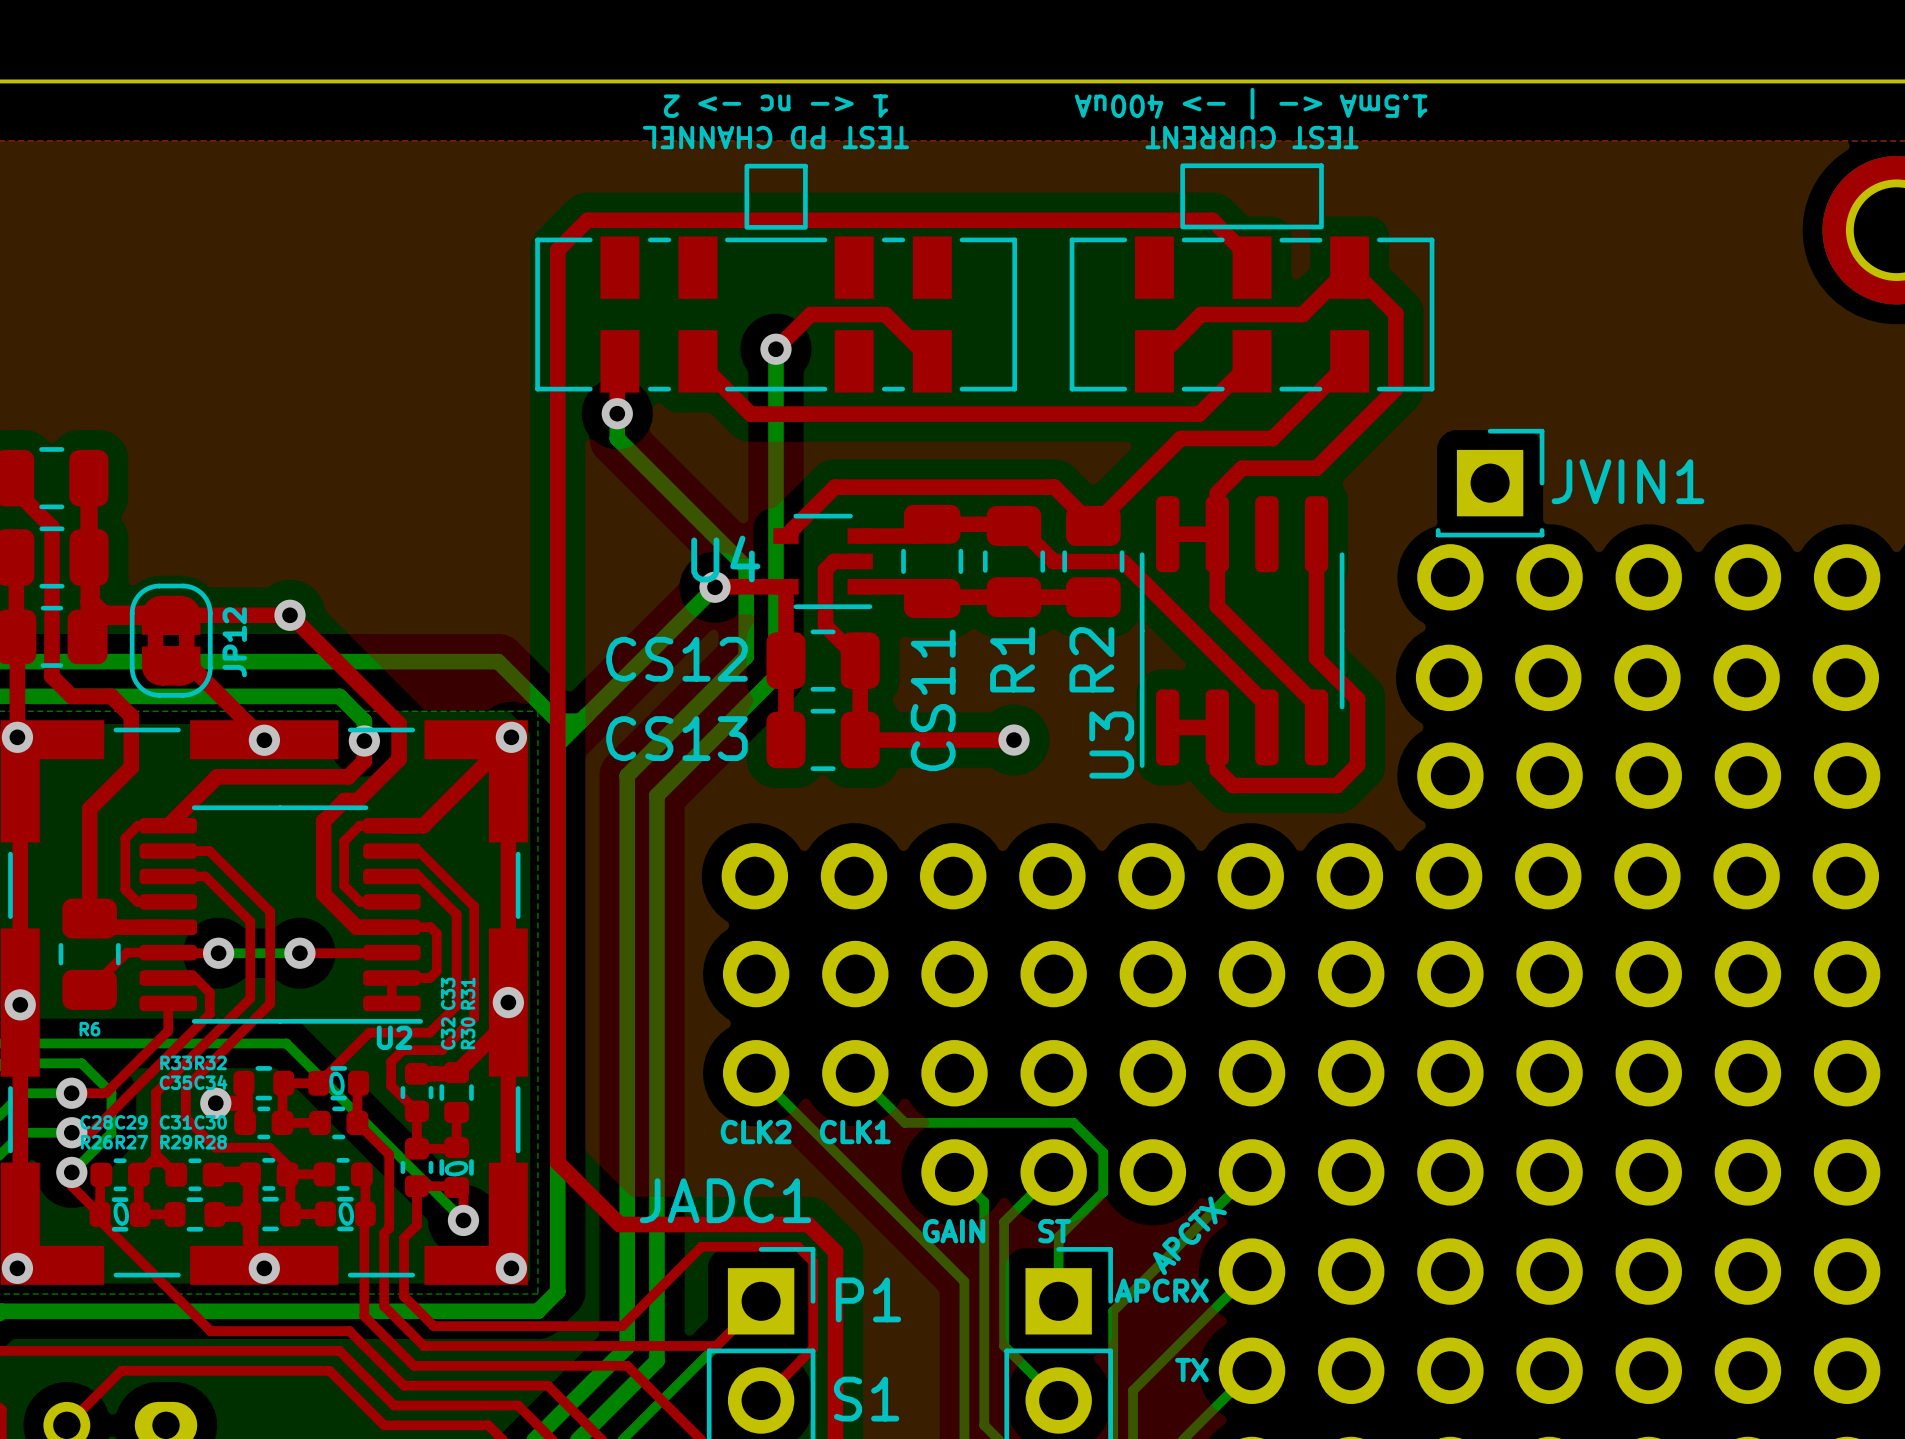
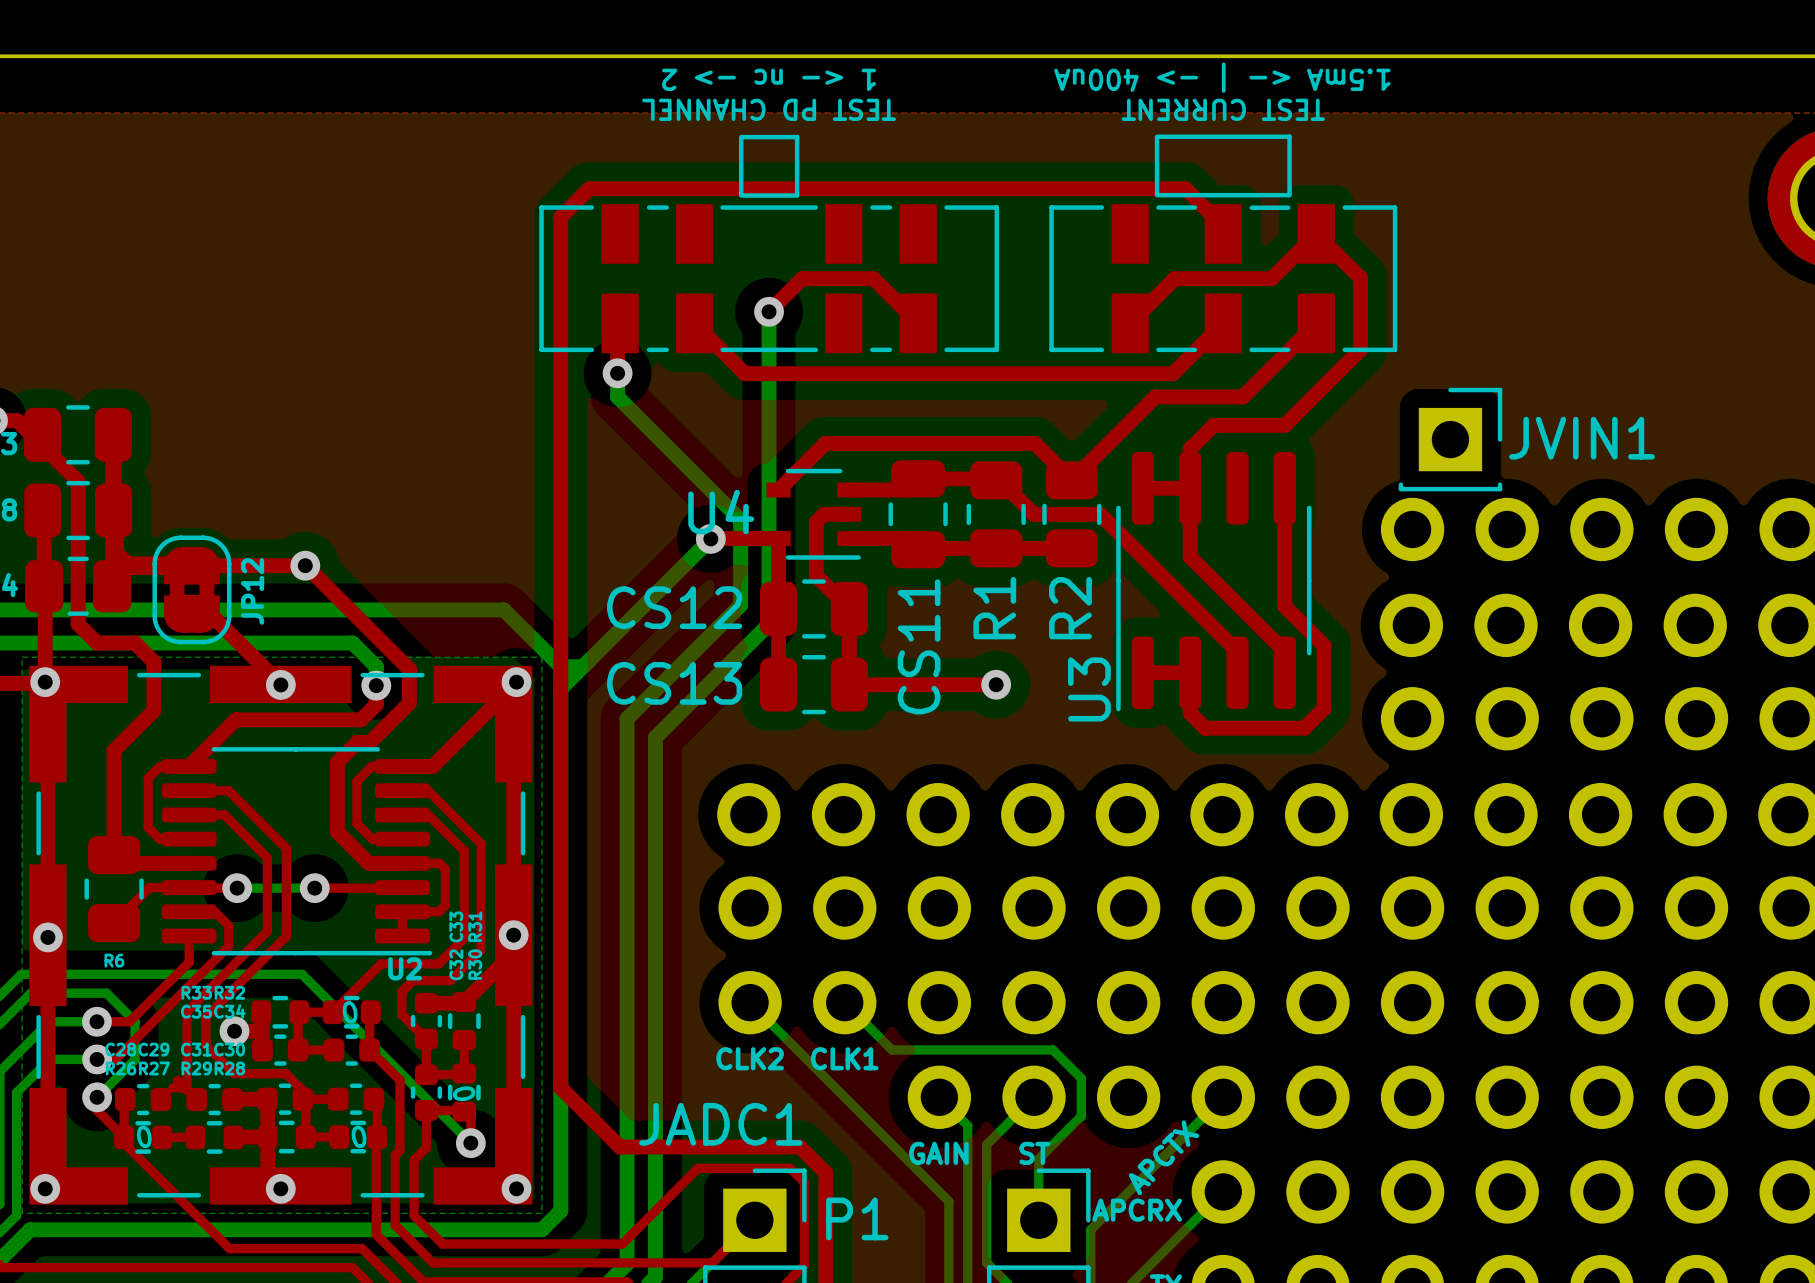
top track: (166, 1082) (156, 1092) (156, 1157) (138, 1174) (139, 1214) -> (187, 1011) (187, 1089)

